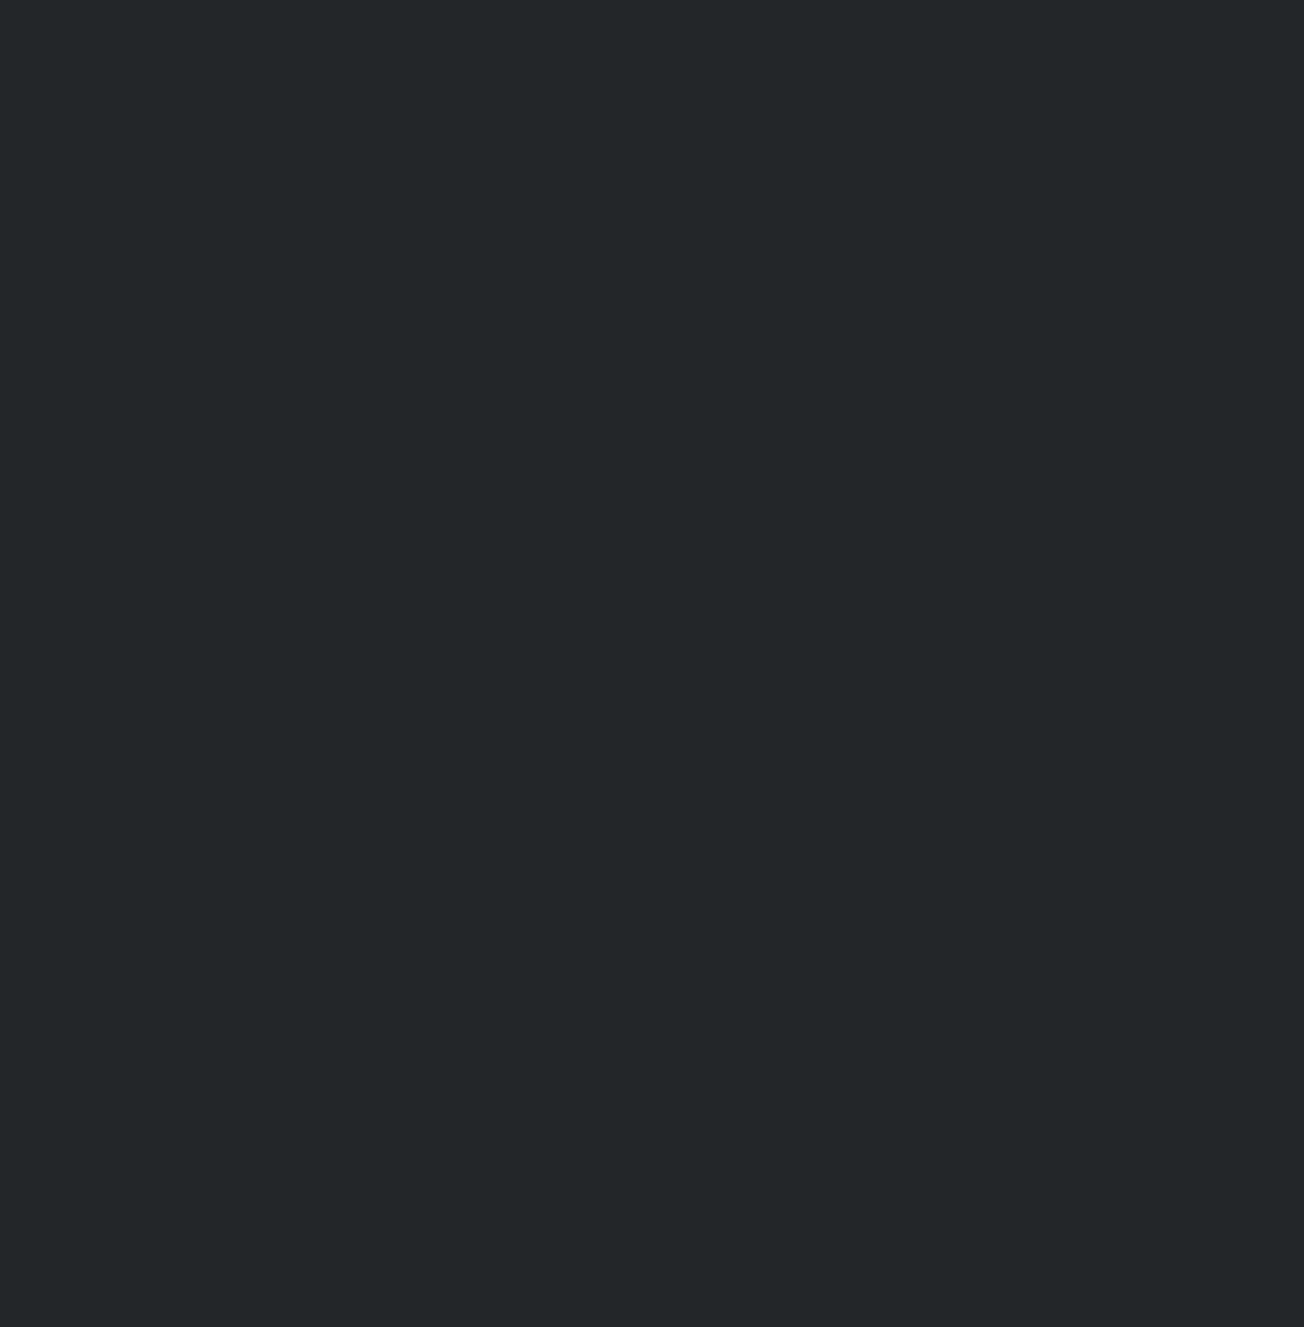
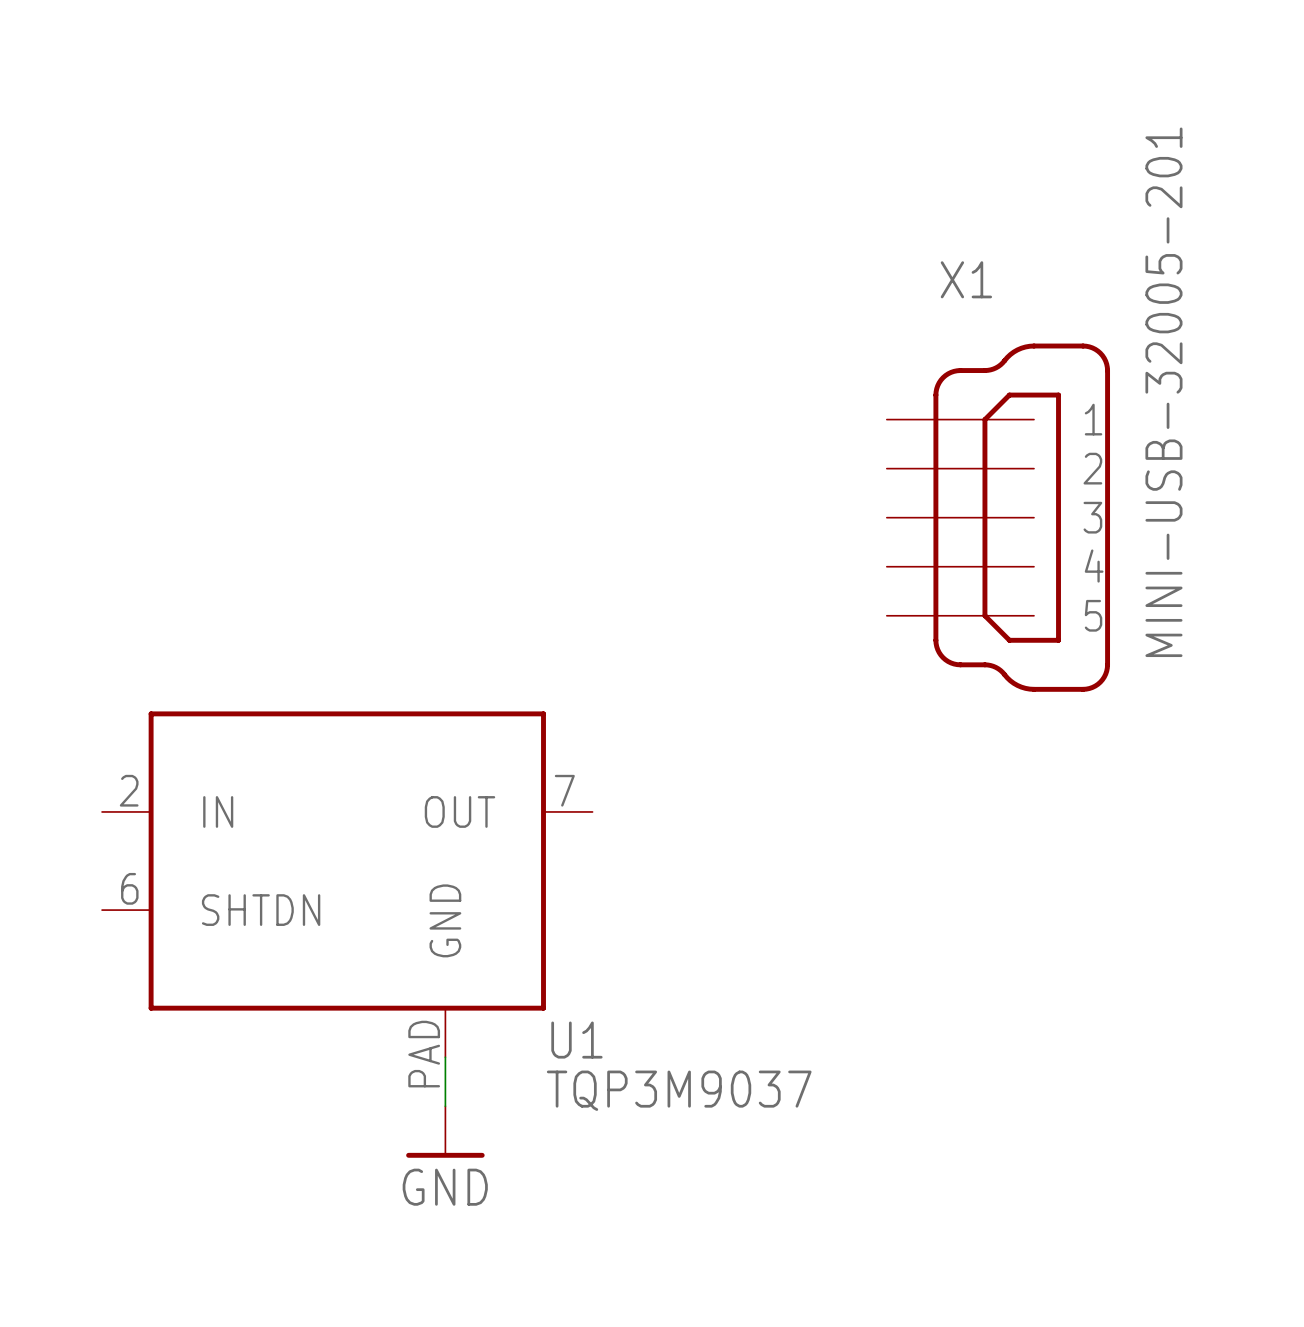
X1: none -> MINI-USB-32005-201 (998, 517)
U1: none -> TQP3M9037 (347, 884)
wire: none -> (445, 1057) (445, 1106)
power symbol: none -> GND (445, 1132)

